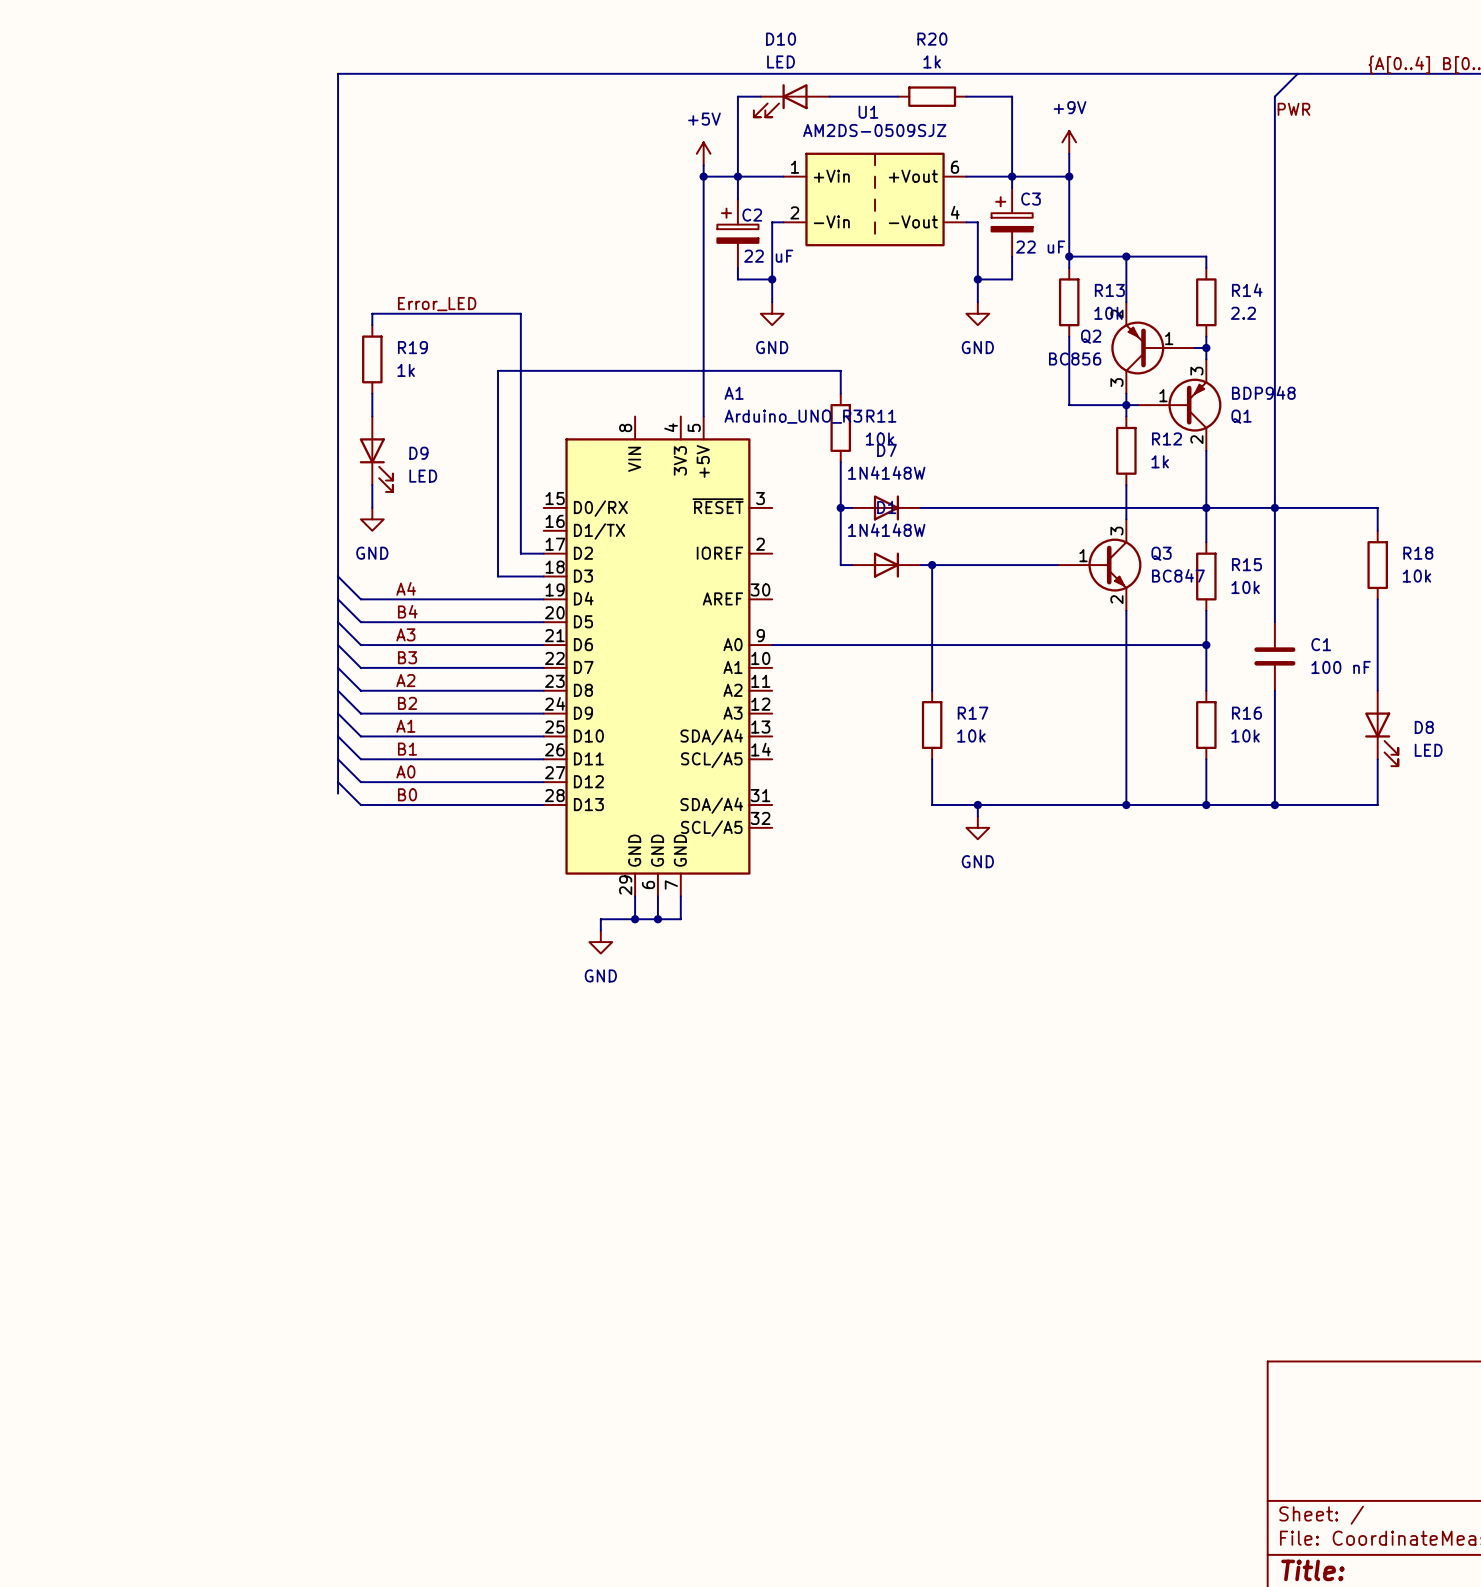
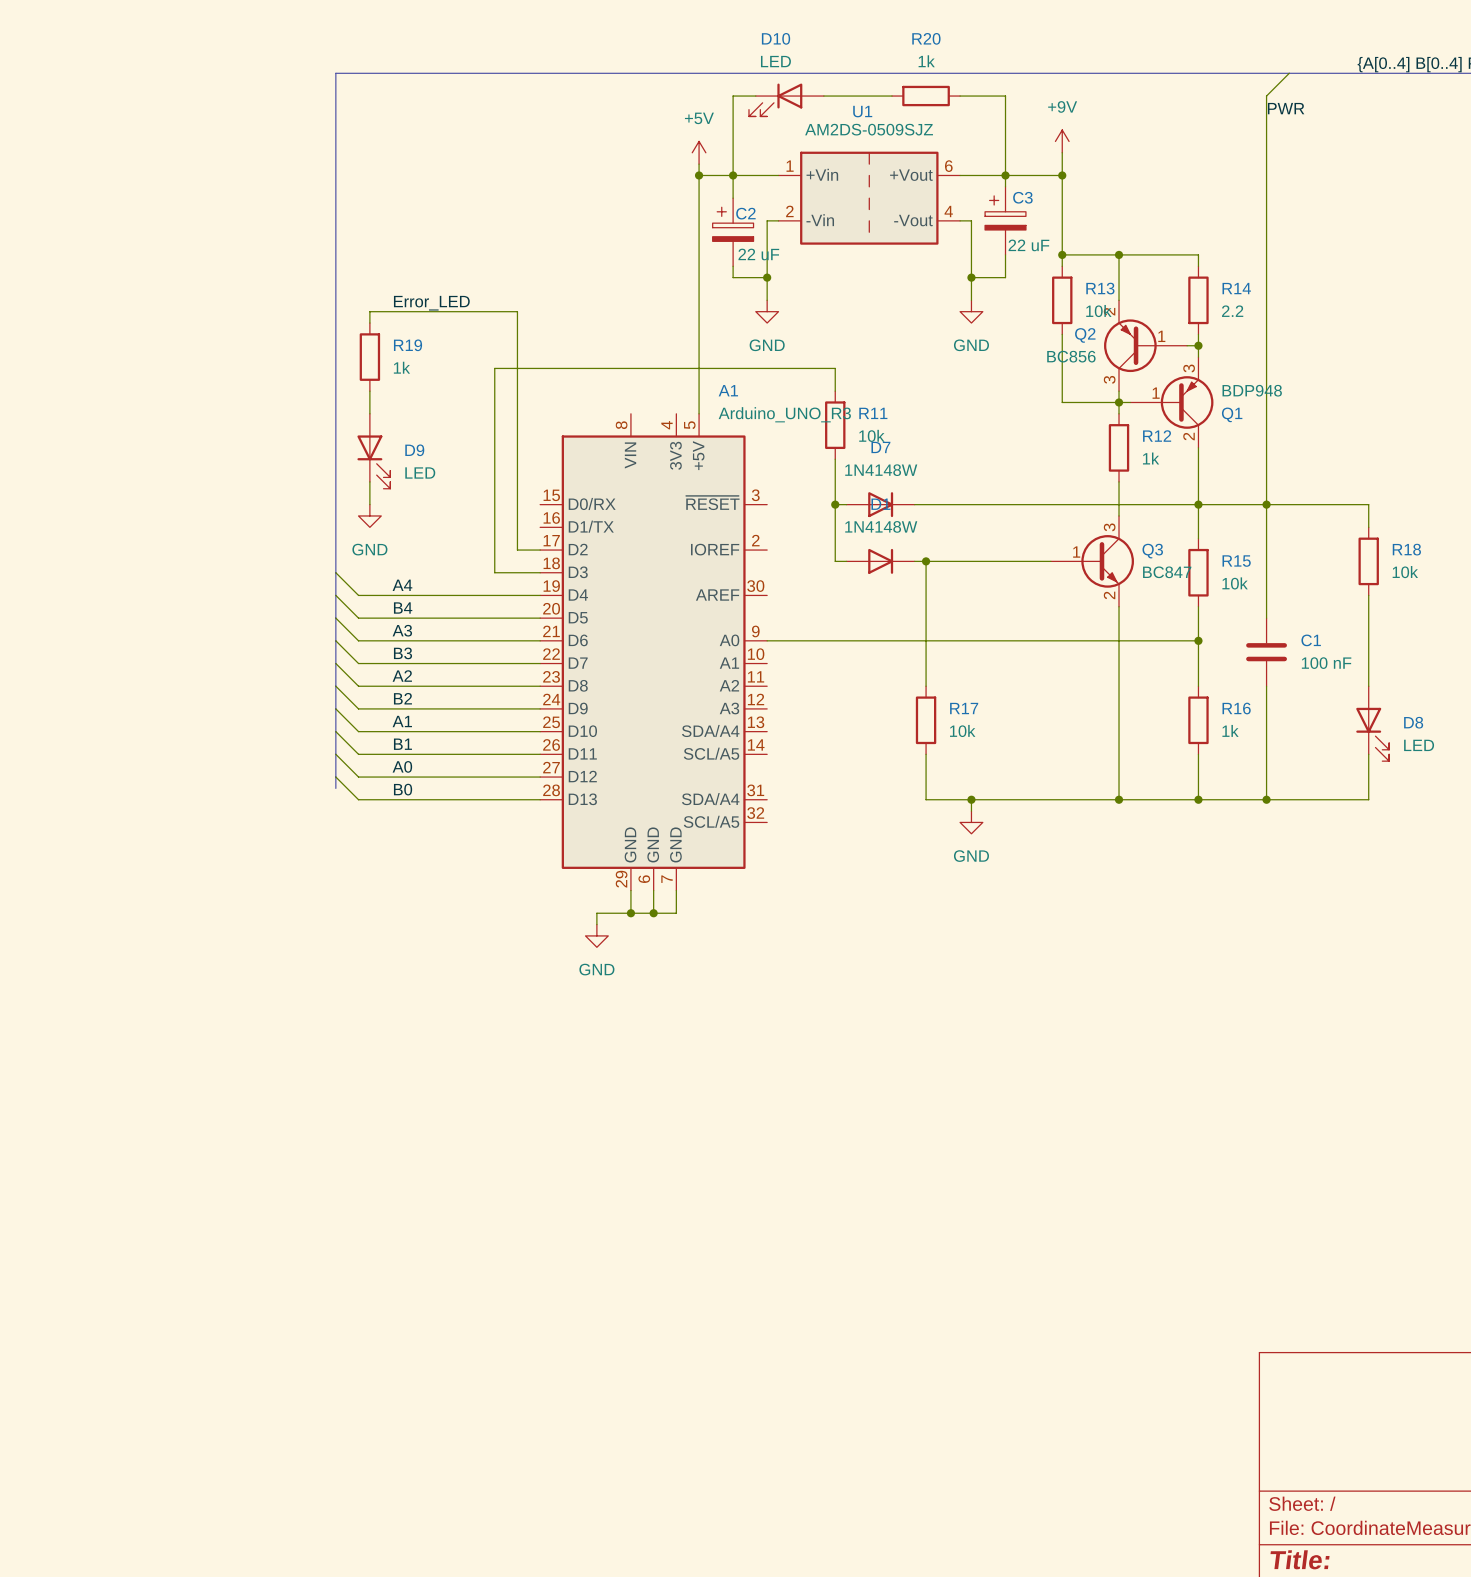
R16 value: 10k (1245, 736) -> 1k (1230, 730)

